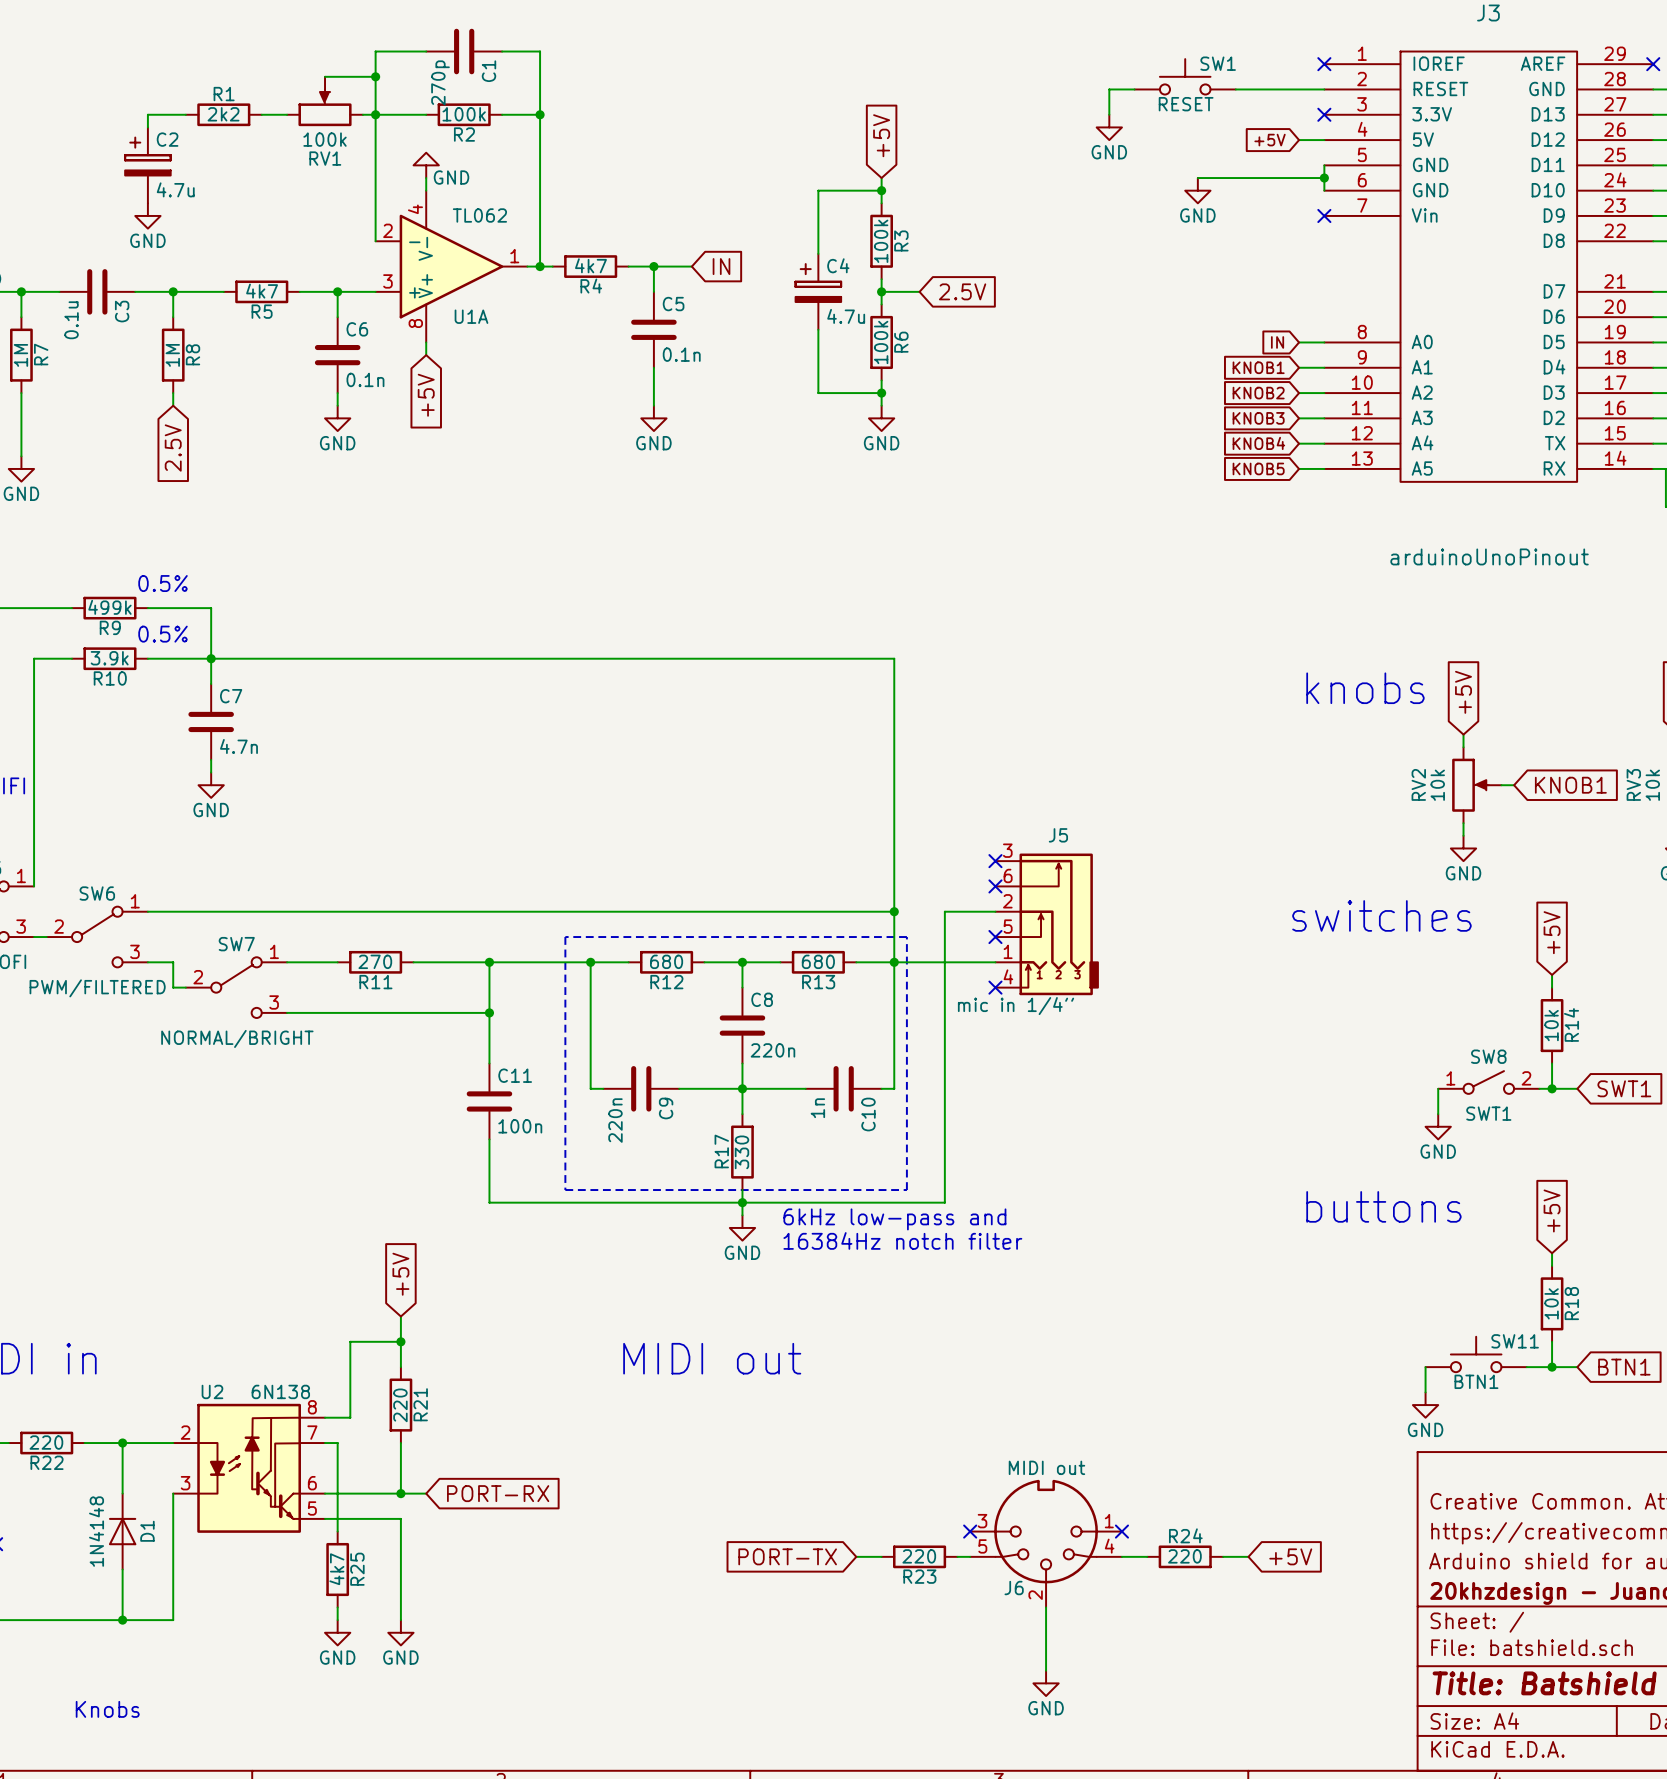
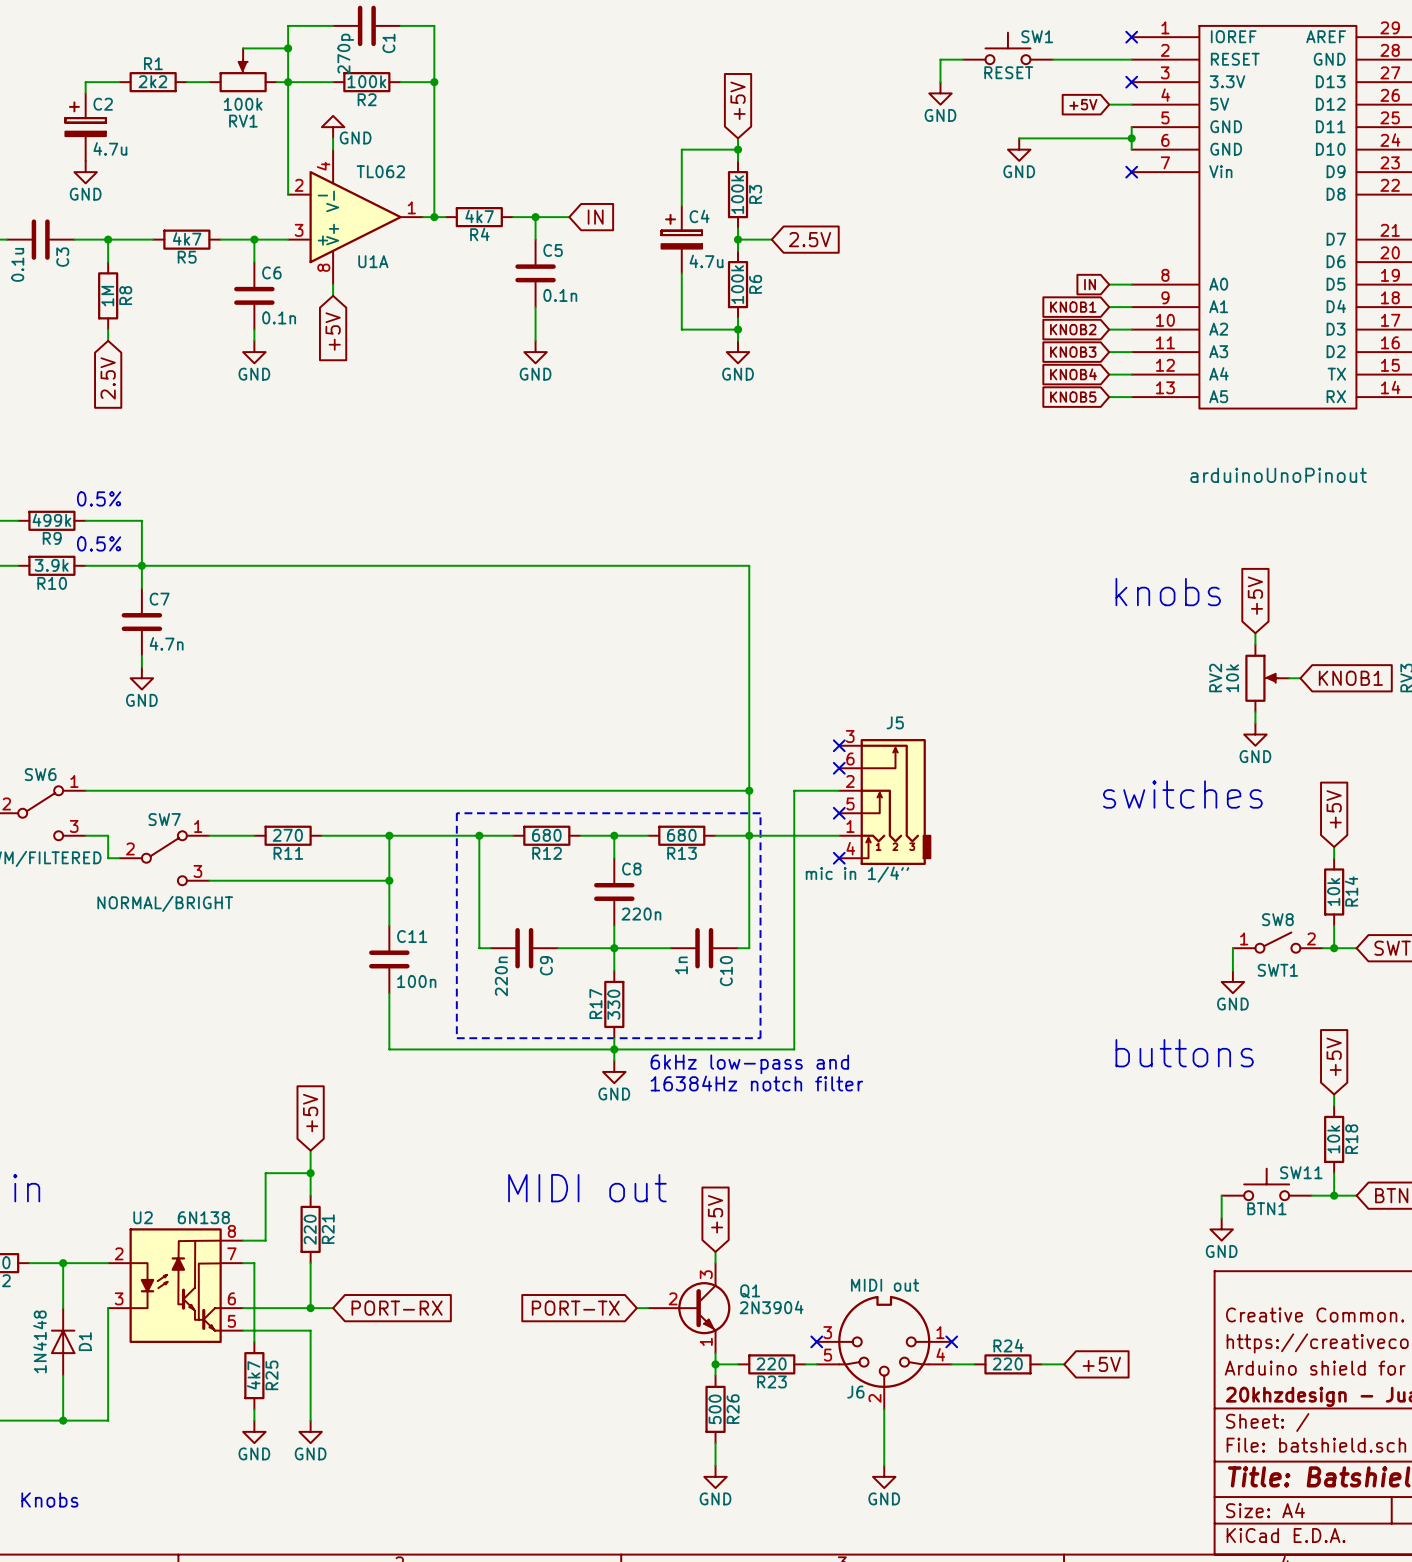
global label: none -> +5V (715, 1214)
wire: none -> (715, 1251) (715, 1263)
wire: none -> (636, 1308) (648, 1308)
Q1: none -> 2N3904 (689, 1308)
wire: none -> (715, 1353) (715, 1375)
global label position: PORT-TX (787, 1556) -> PORT-TX (575, 1308)
junction: none -> (715, 1364)
R26: none -> 500 (715, 1409)
wire: none -> (715, 1443) (715, 1465)
power symbol: none -> GND (715, 1476)

